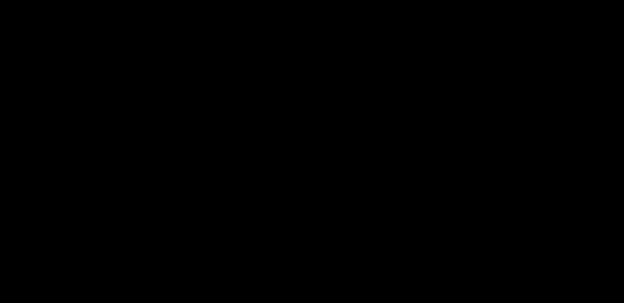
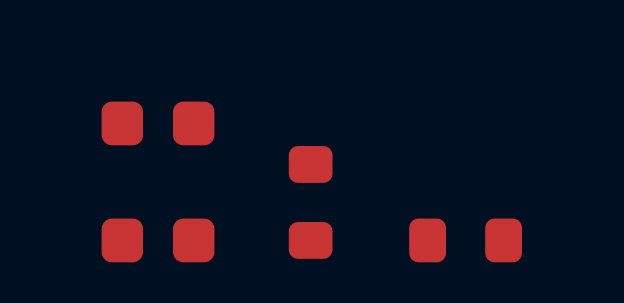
part: none -> (158, 123)
part: none -> (310, 202)
part: none -> (158, 240)
part: none -> (465, 240)

